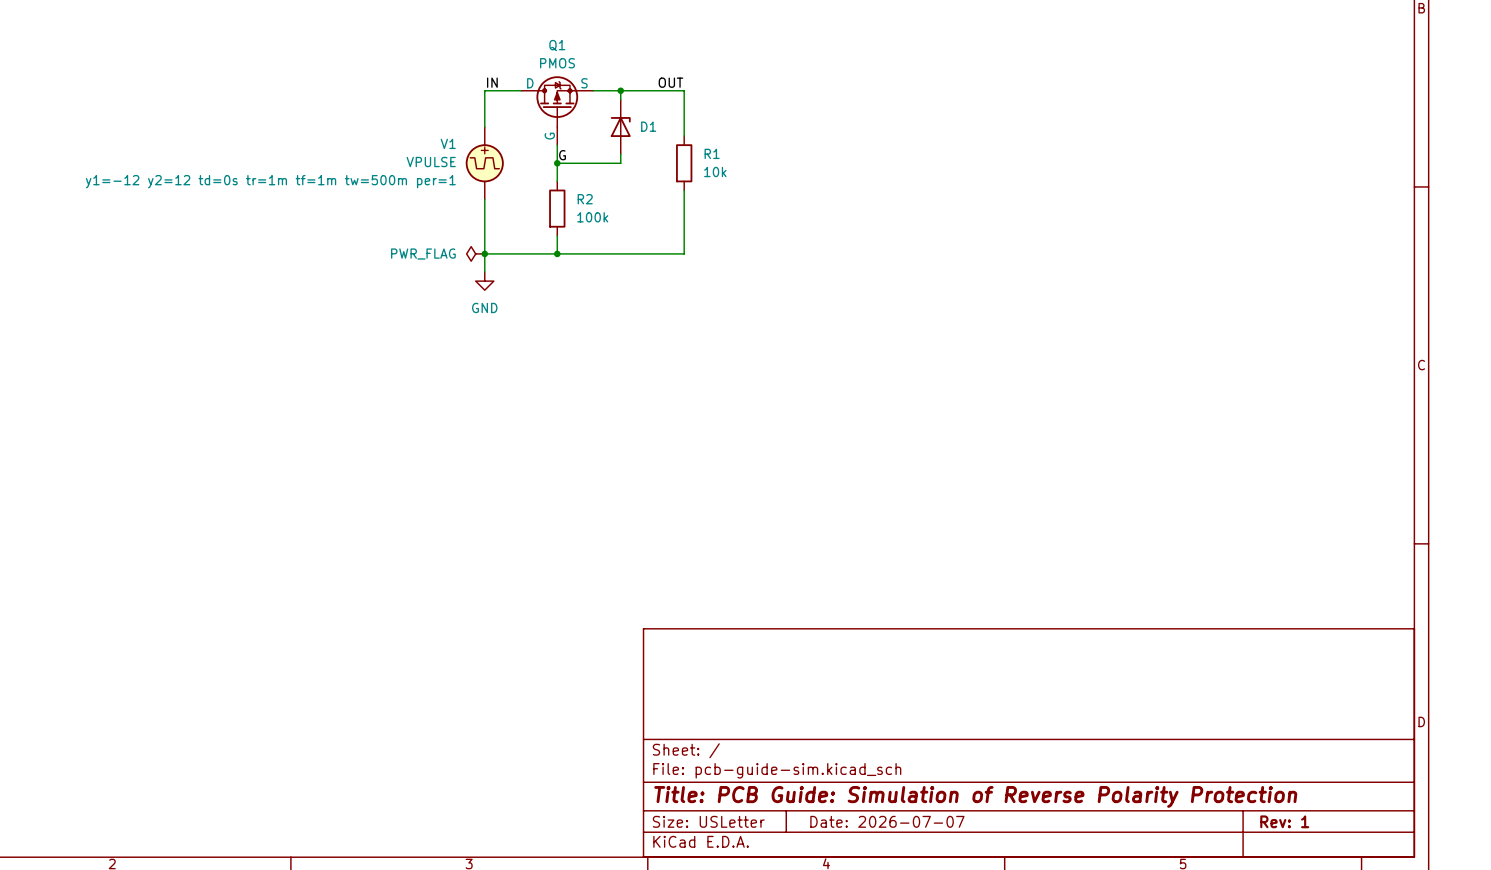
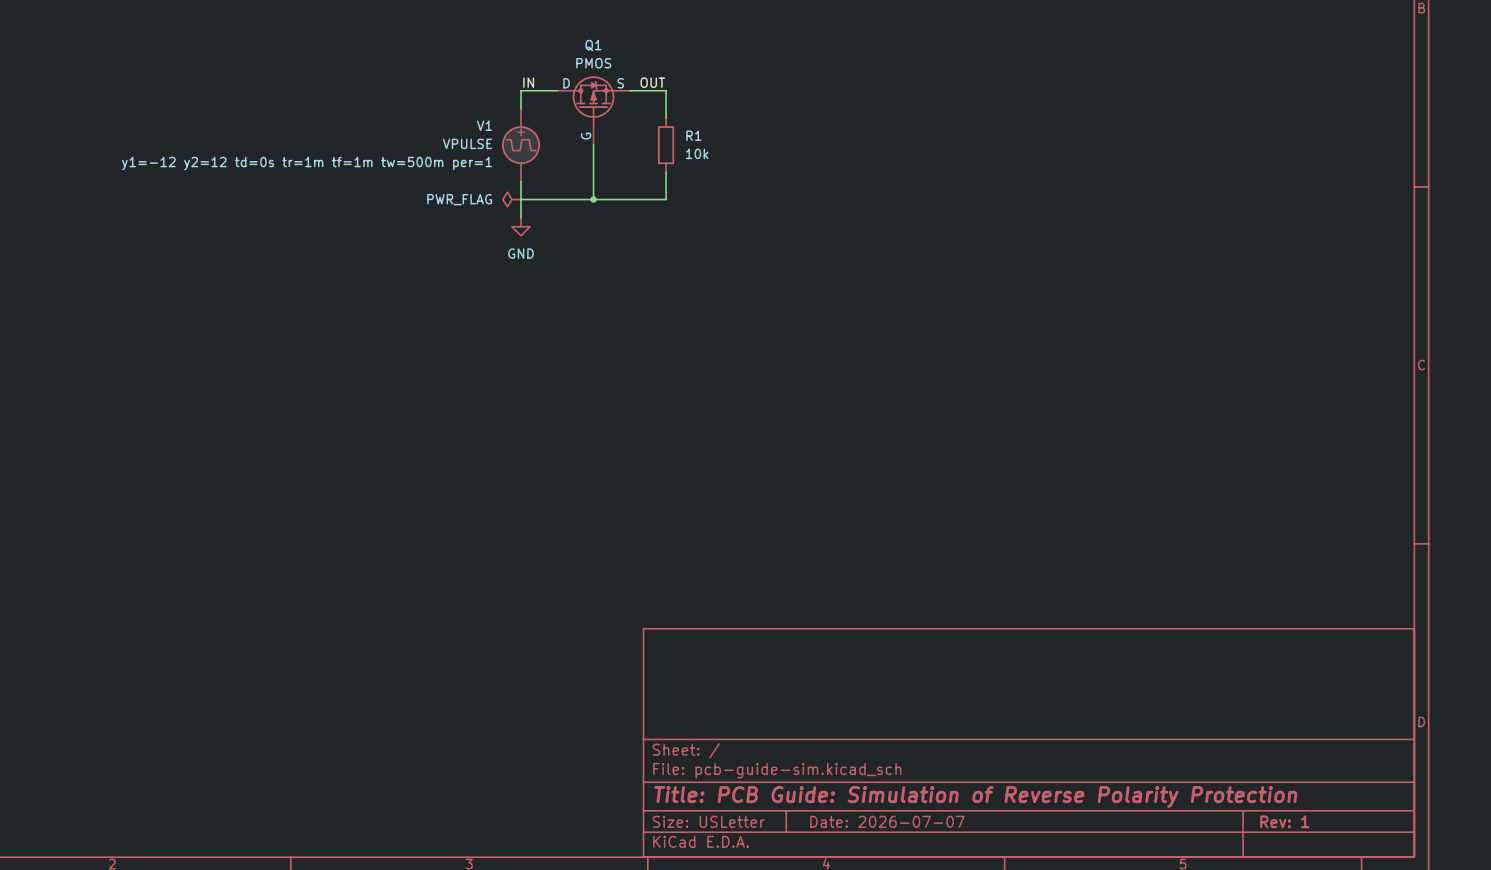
label position: IN (492, 82) -> IN (528, 82)
label position: OUT (670, 82) -> OUT (652, 82)
wire: (521, 90) (484, 90) (484, 127) -> none
wire: none -> (557, 90) (521, 90) (521, 108)
wire: (620, 90) (620, 99) -> none
junction: (620, 90) -> none
wire: (666, 90) (684, 90) (684, 136) -> (666, 90) (666, 117)
Q1 position: (557, 110) -> (593, 110)
D1: (620, 127) -> none
wire: (557, 145) (557, 181) -> (521, 181) (521, 217)
wire: none -> (593, 145) (593, 199)
wire: (620, 154) (620, 163) (557, 163) -> none
label: G (562, 155) -> none
V1 position: (484, 163) -> (521, 145)
junction: (557, 163) -> none
R1 position: (684, 163) -> (666, 145)
wire: none -> (666, 172) (666, 199) (521, 199)
wire: (684, 190) (684, 253) (484, 253) -> none
wire: (484, 199) (484, 272) -> none
junction: none -> (593, 199)
R2: 100k (557, 208) -> none
wire: (557, 235) (557, 253) -> none
power symbol position: PWR_FLAG (475, 253) -> PWR_FLAG (511, 199)
junction: (484, 253) -> none
junction: (557, 253) -> none
power symbol position: GND (484, 281) -> GND (521, 226)

